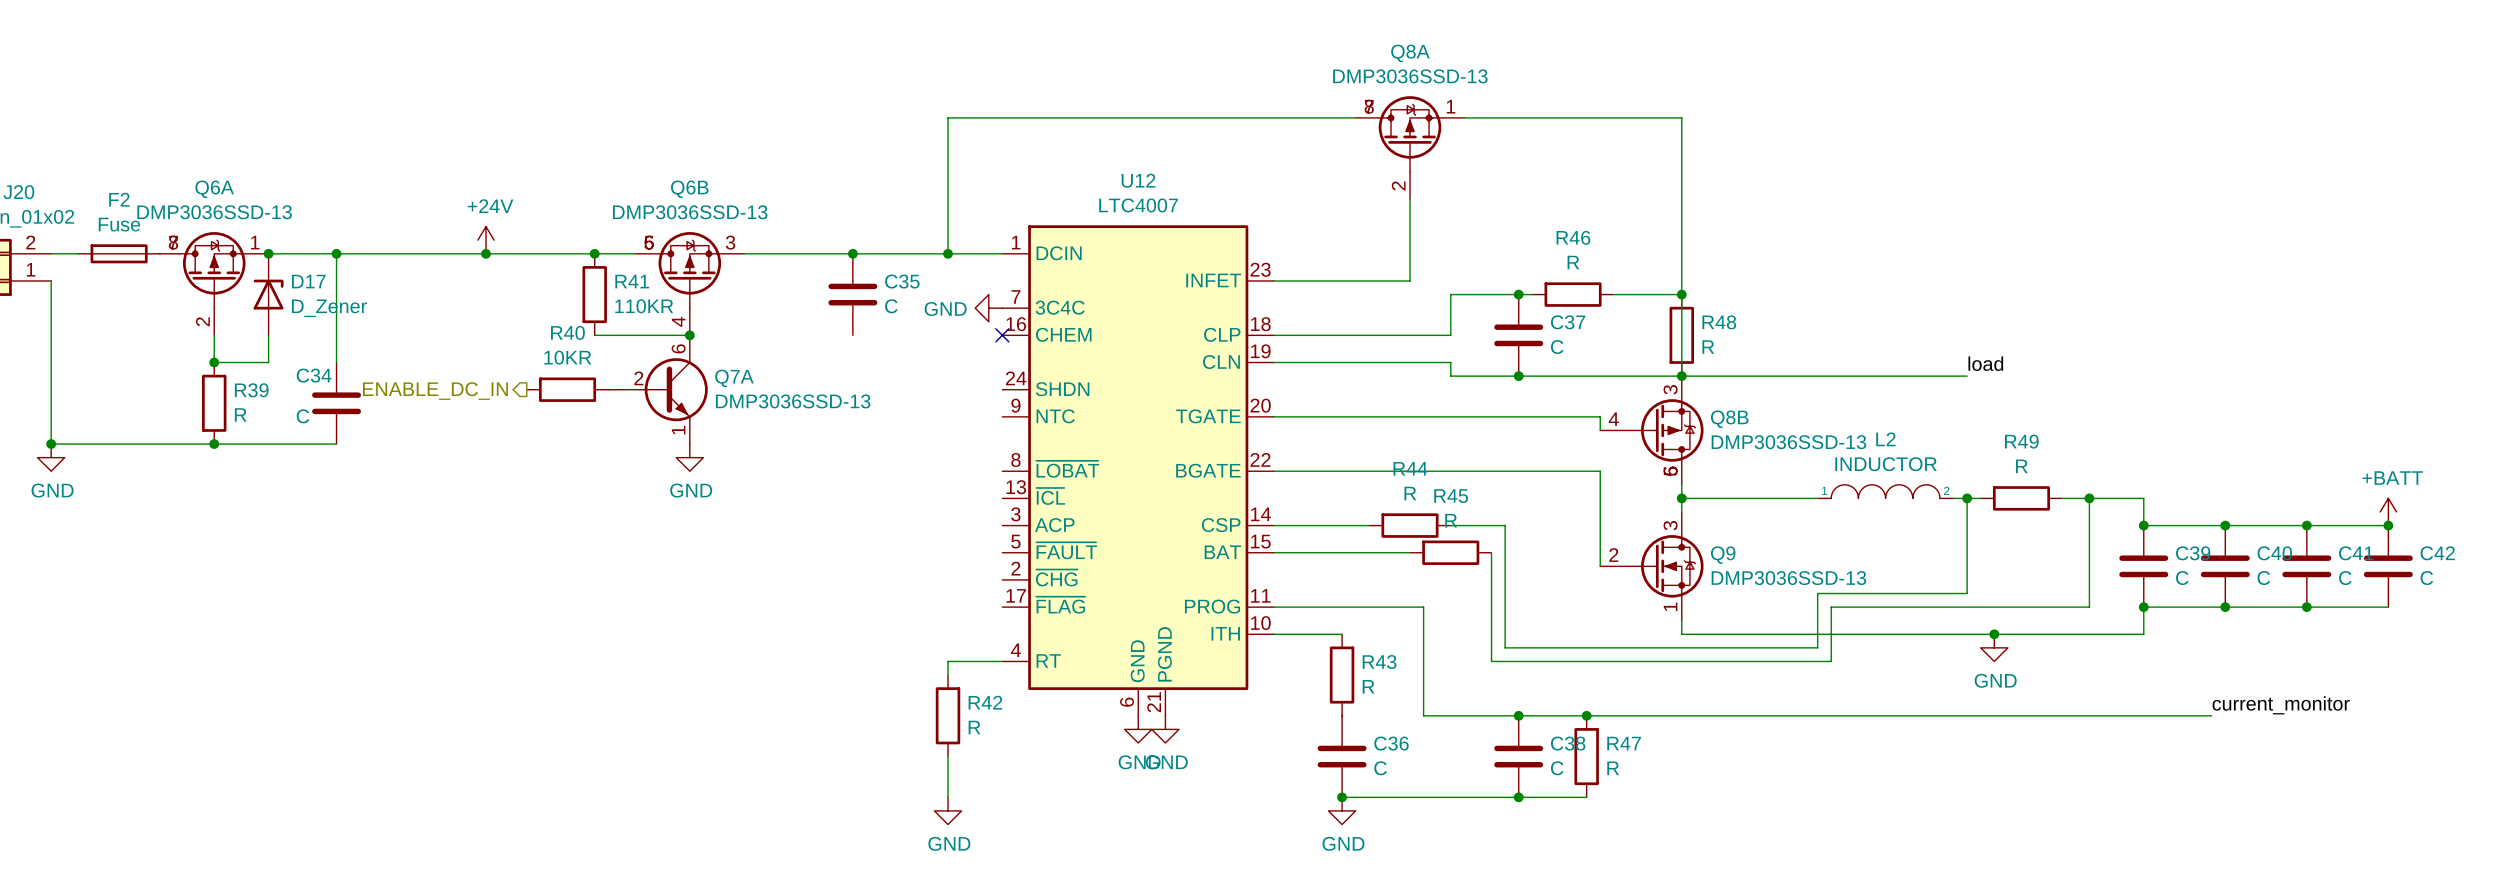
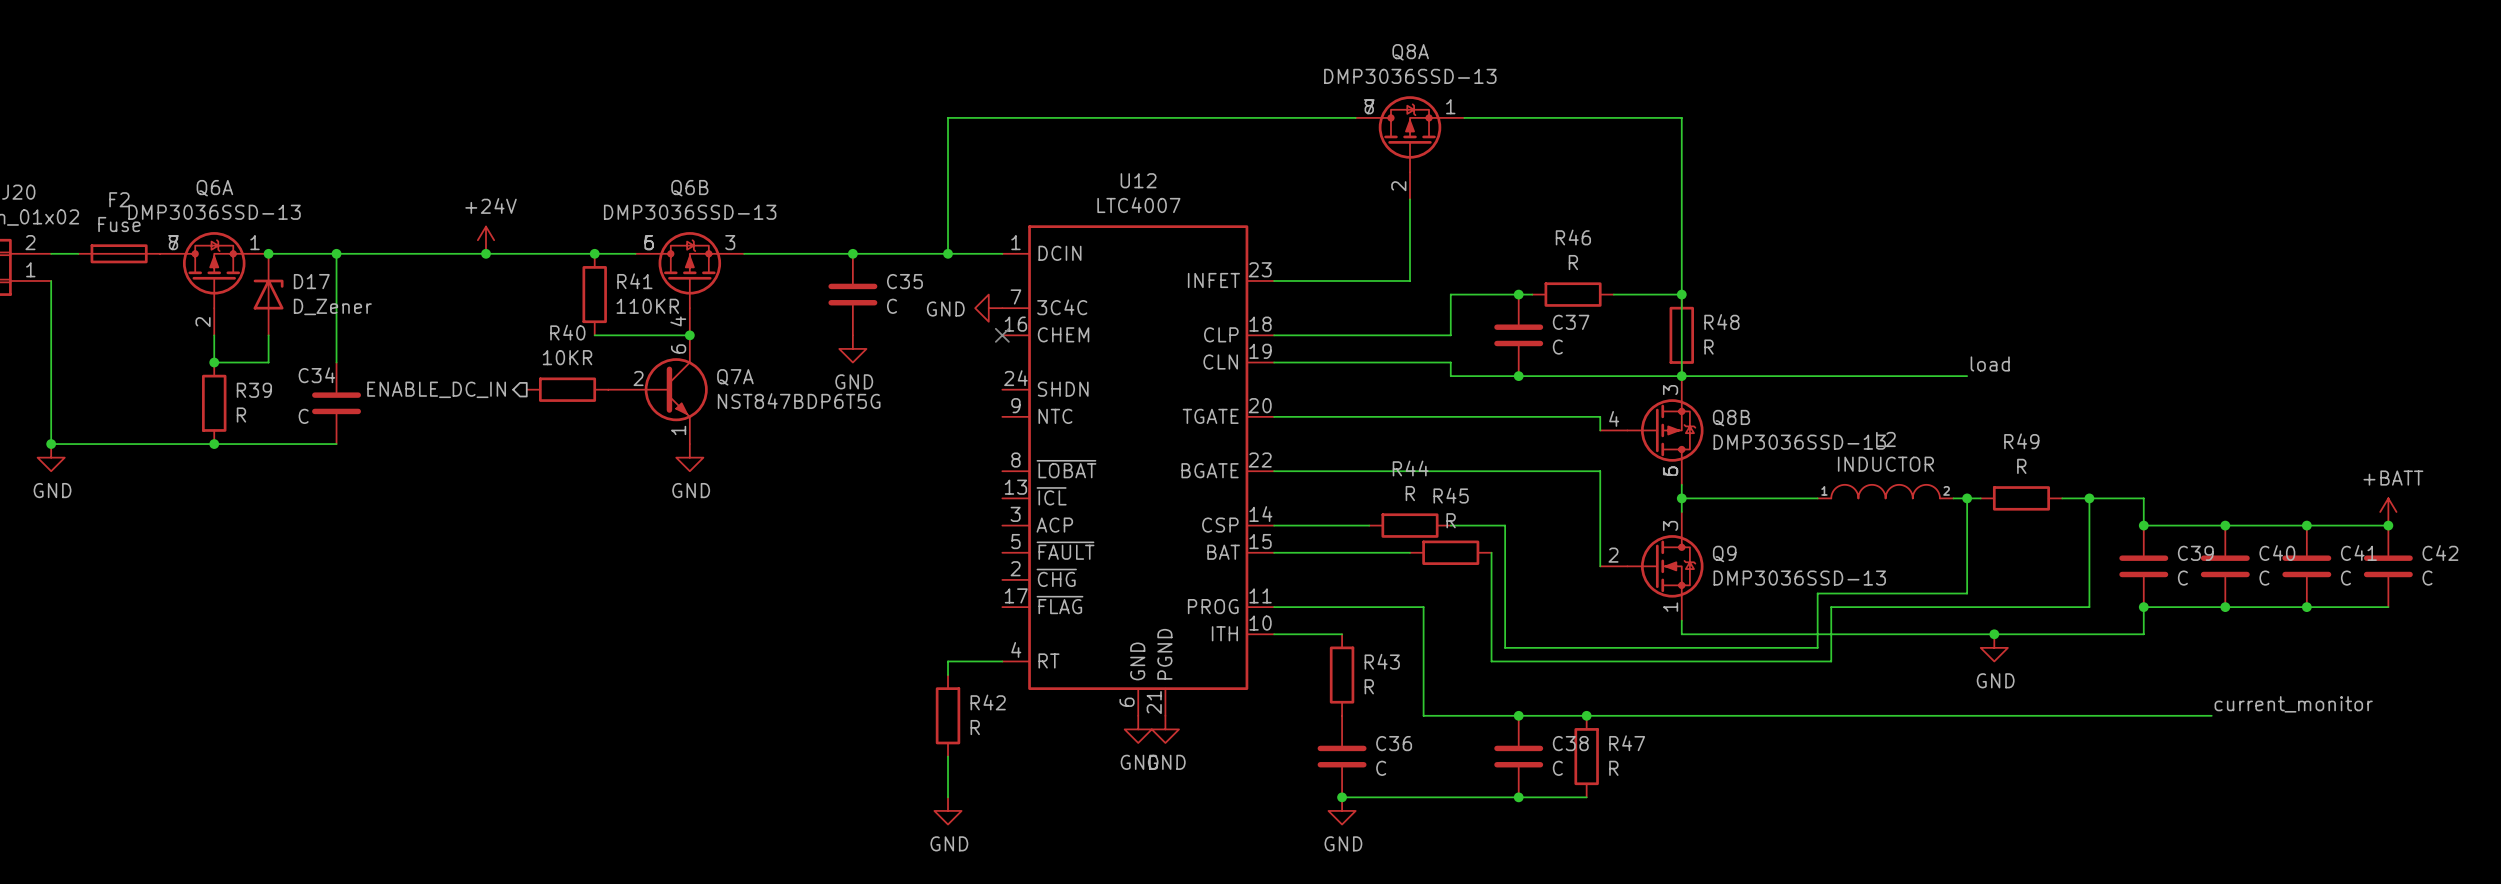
power symbol: none -> GND (852, 348)
Q7A value: DMP3036SSD-13 (793, 401) -> NST847BDP6T5G (799, 401)

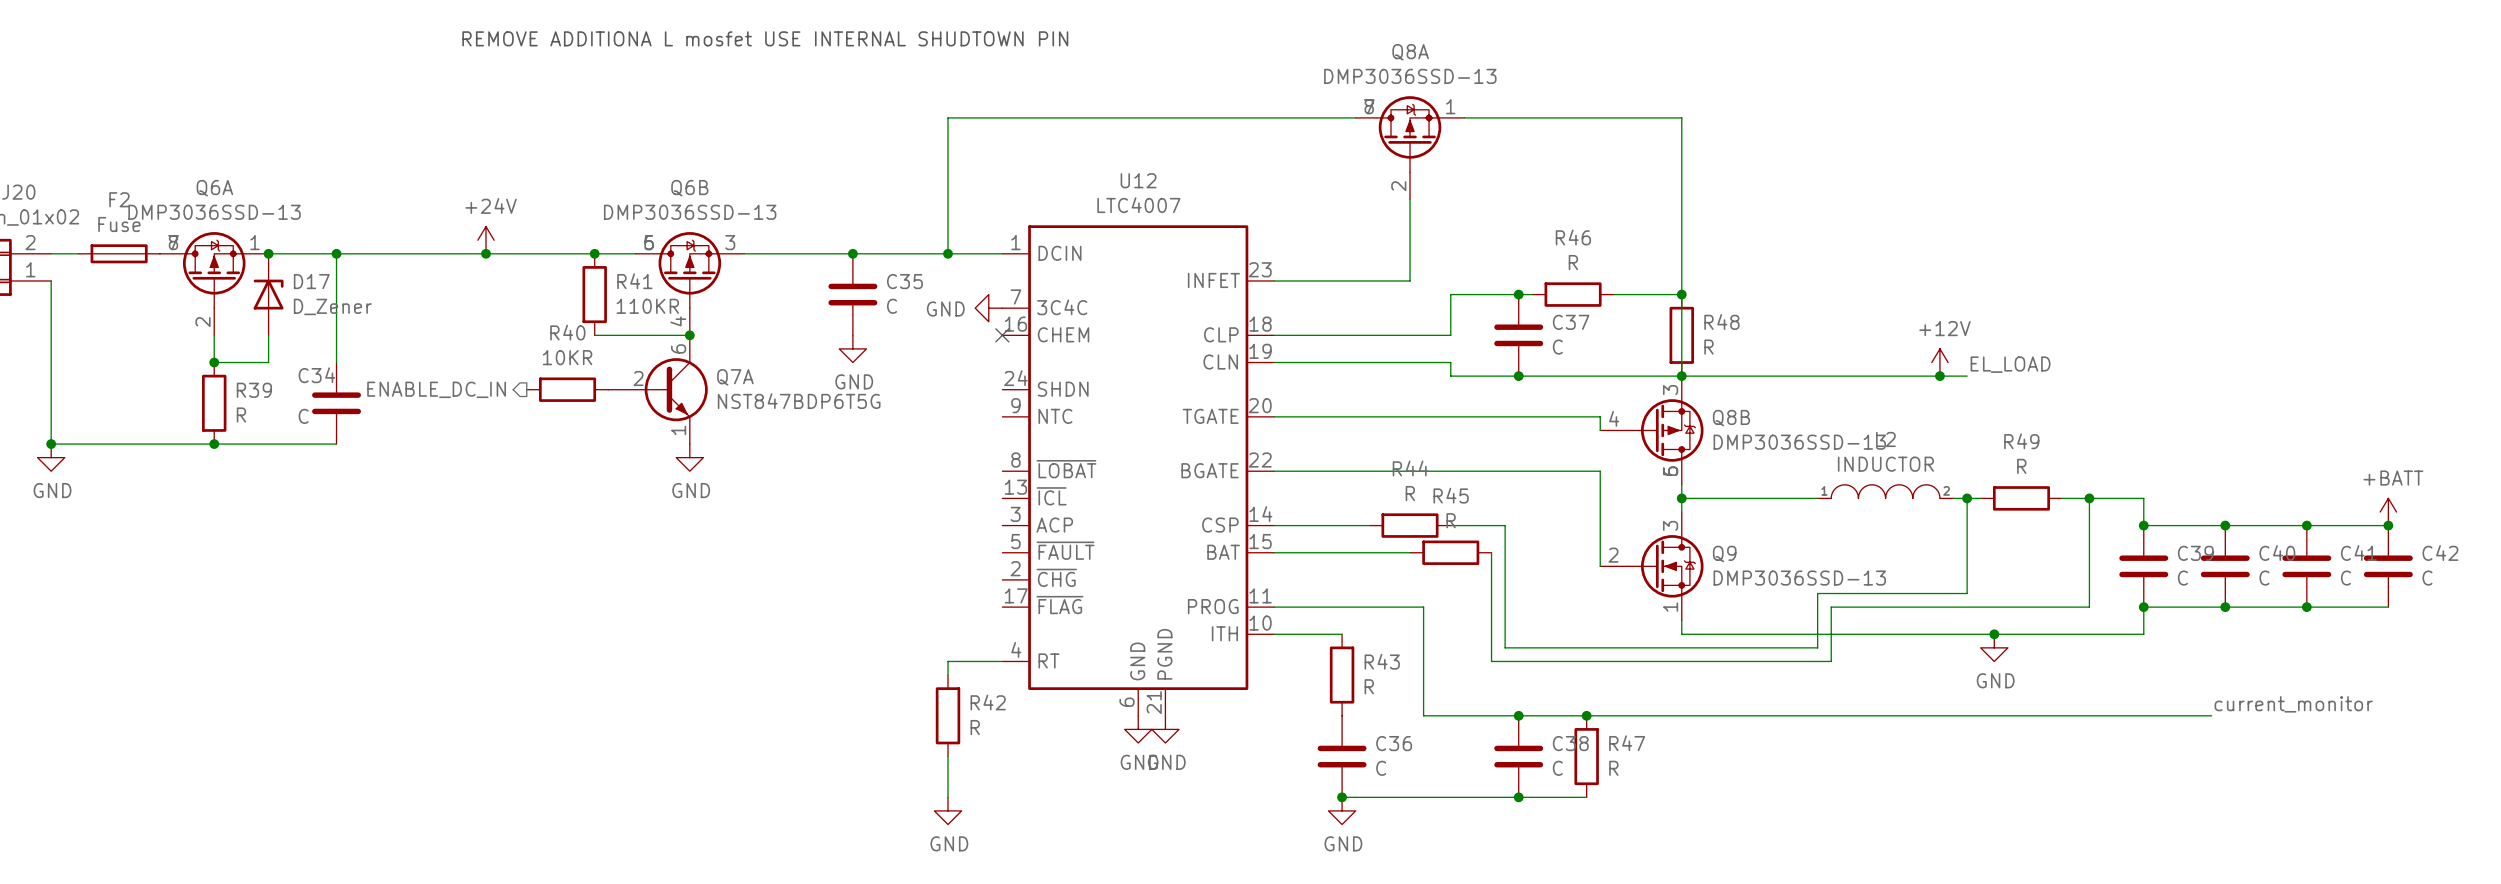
text: none -> REMOVE ADDITIONA L mosfet USE INTERNAL SHUDTOWN PIN (765, 38)
power symbol: none -> +12V (1939, 362)
label: load (1990, 363) -> EL_LOAD (2010, 364)
junction: none -> (1939, 376)

